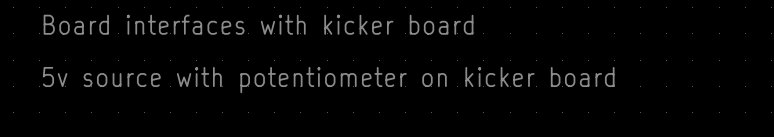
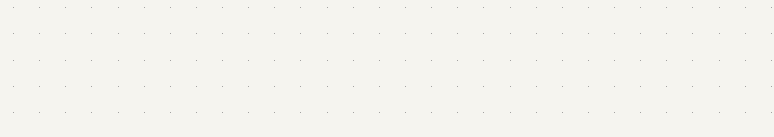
text: Board interfaces with kicker board (258, 24) -> none
text: 5v source with potentiometer on kicker board (328, 80) -> none

